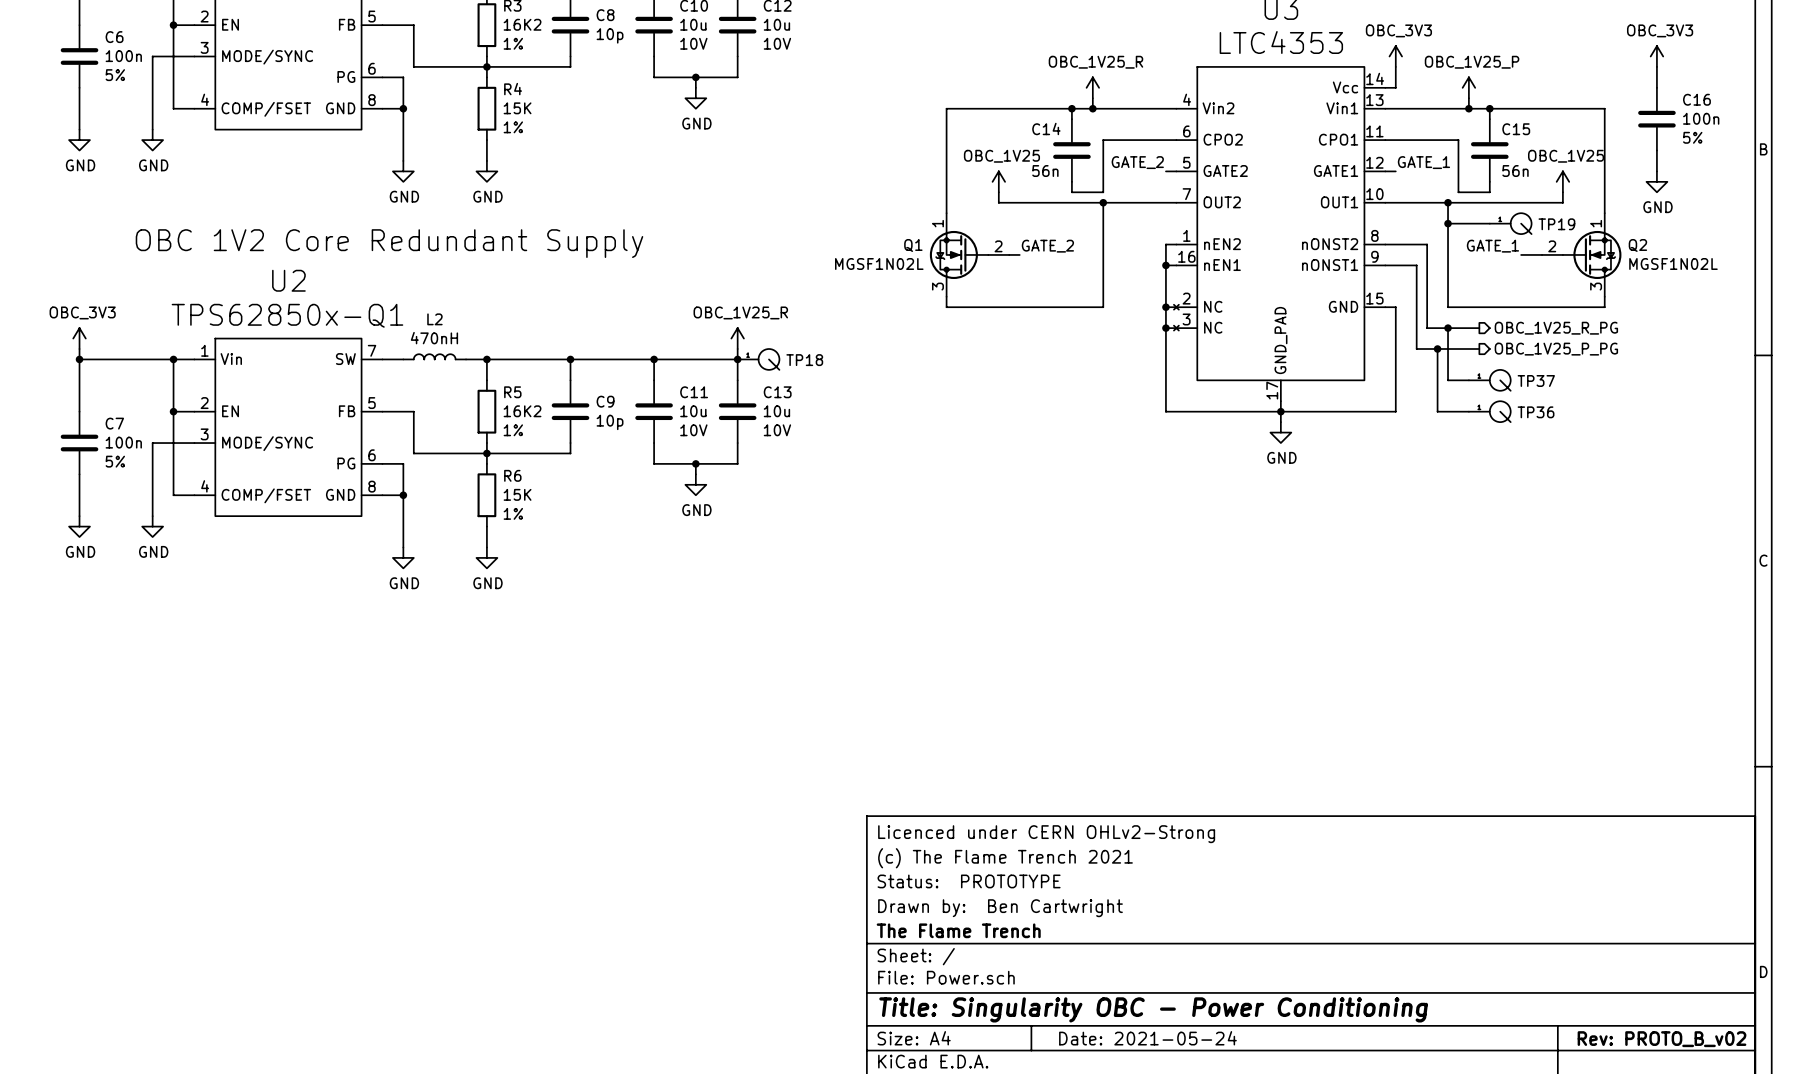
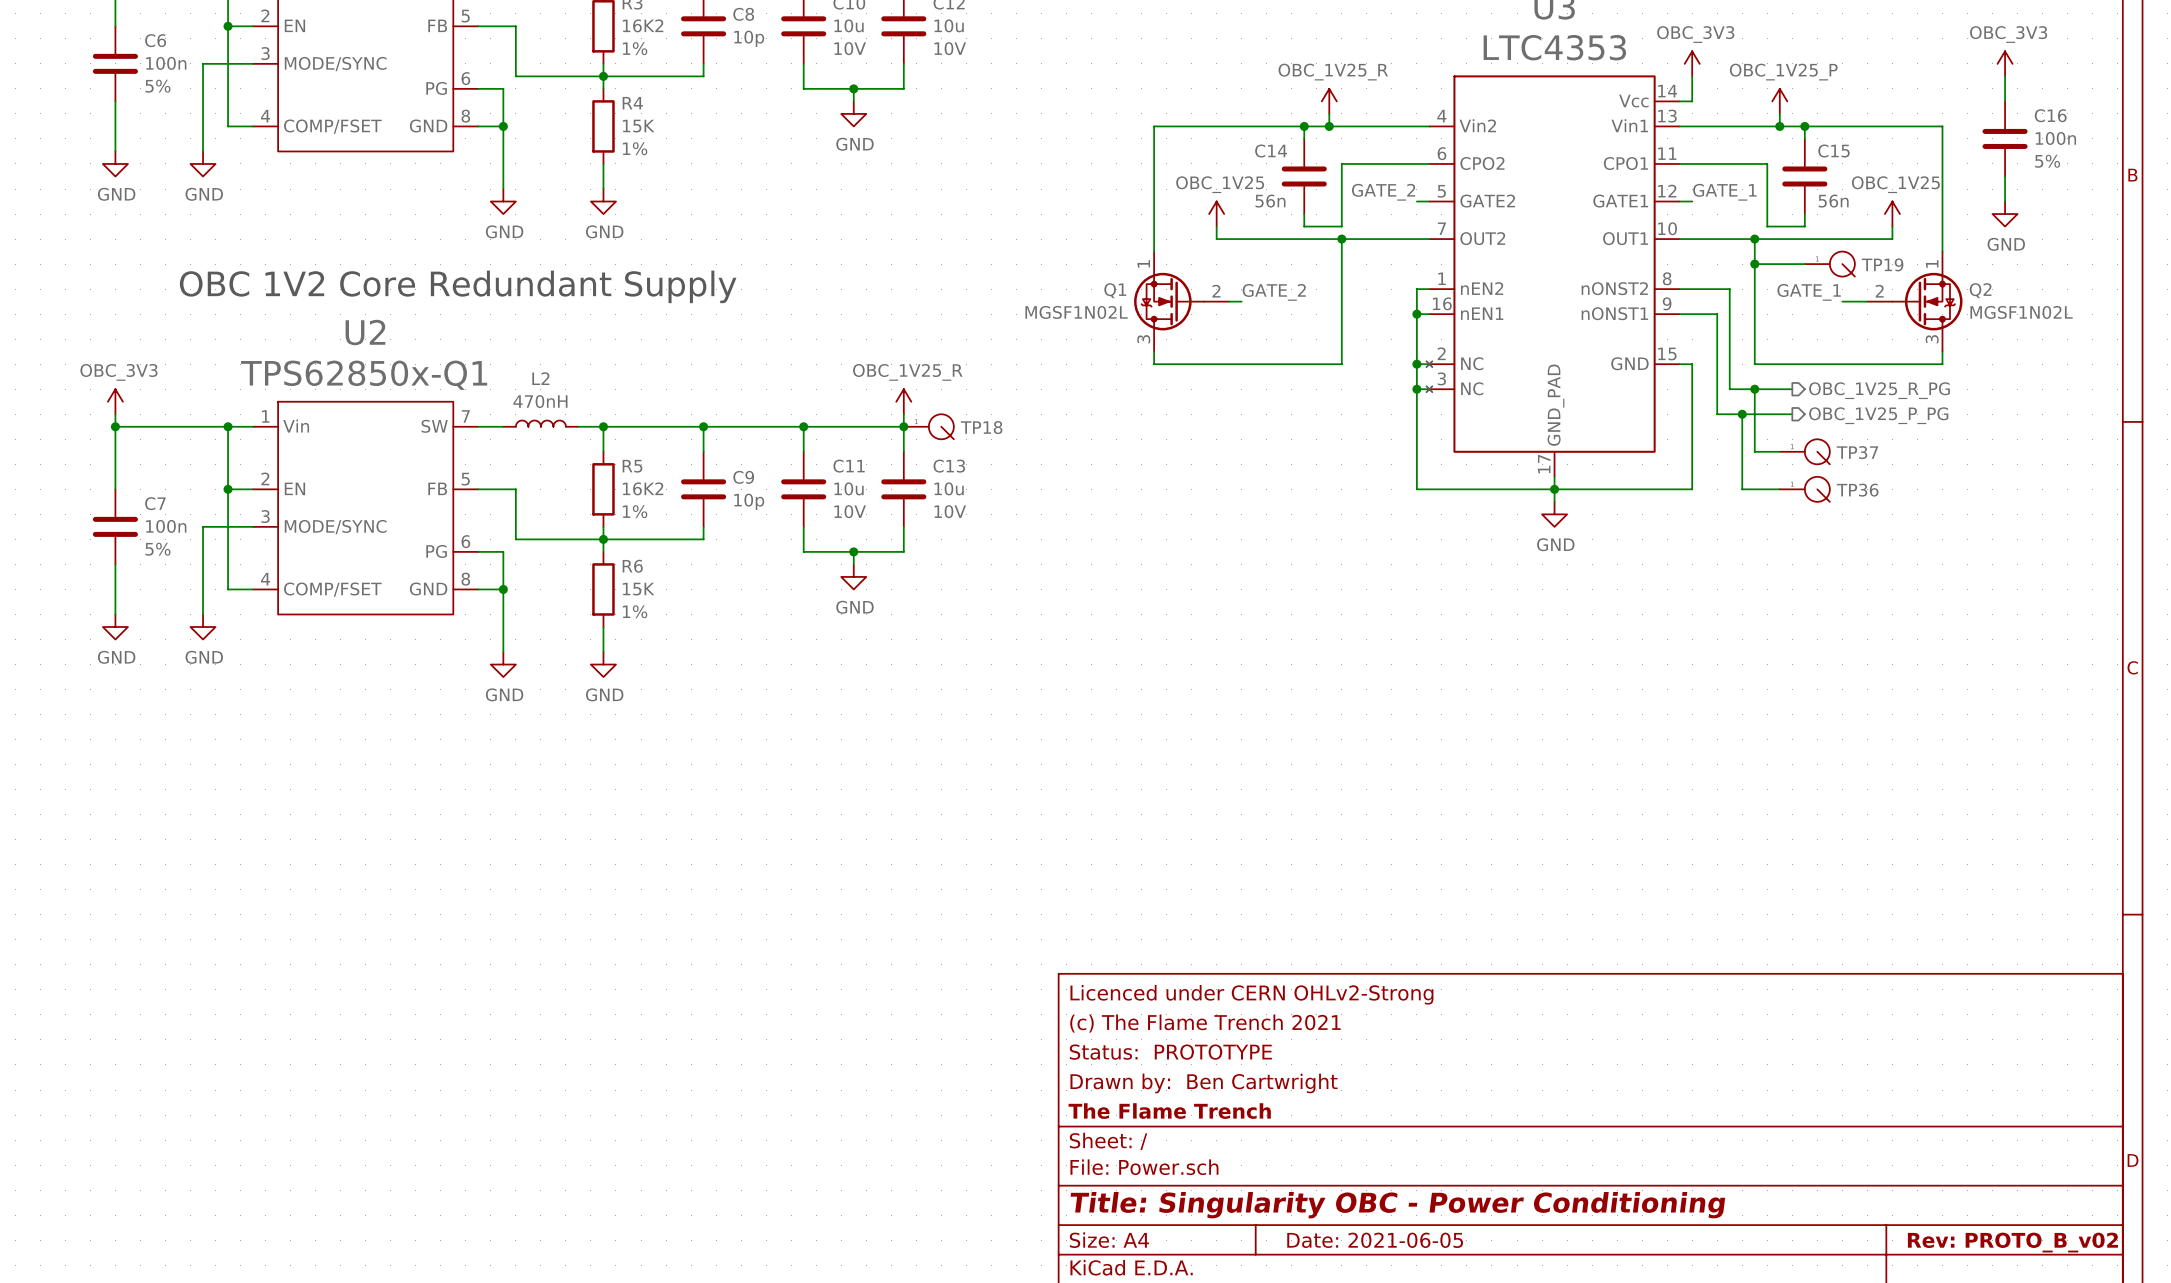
title block: Date: 2021-05-24 (1147, 1038) -> Date: 2021-06-05 (1375, 1240)

